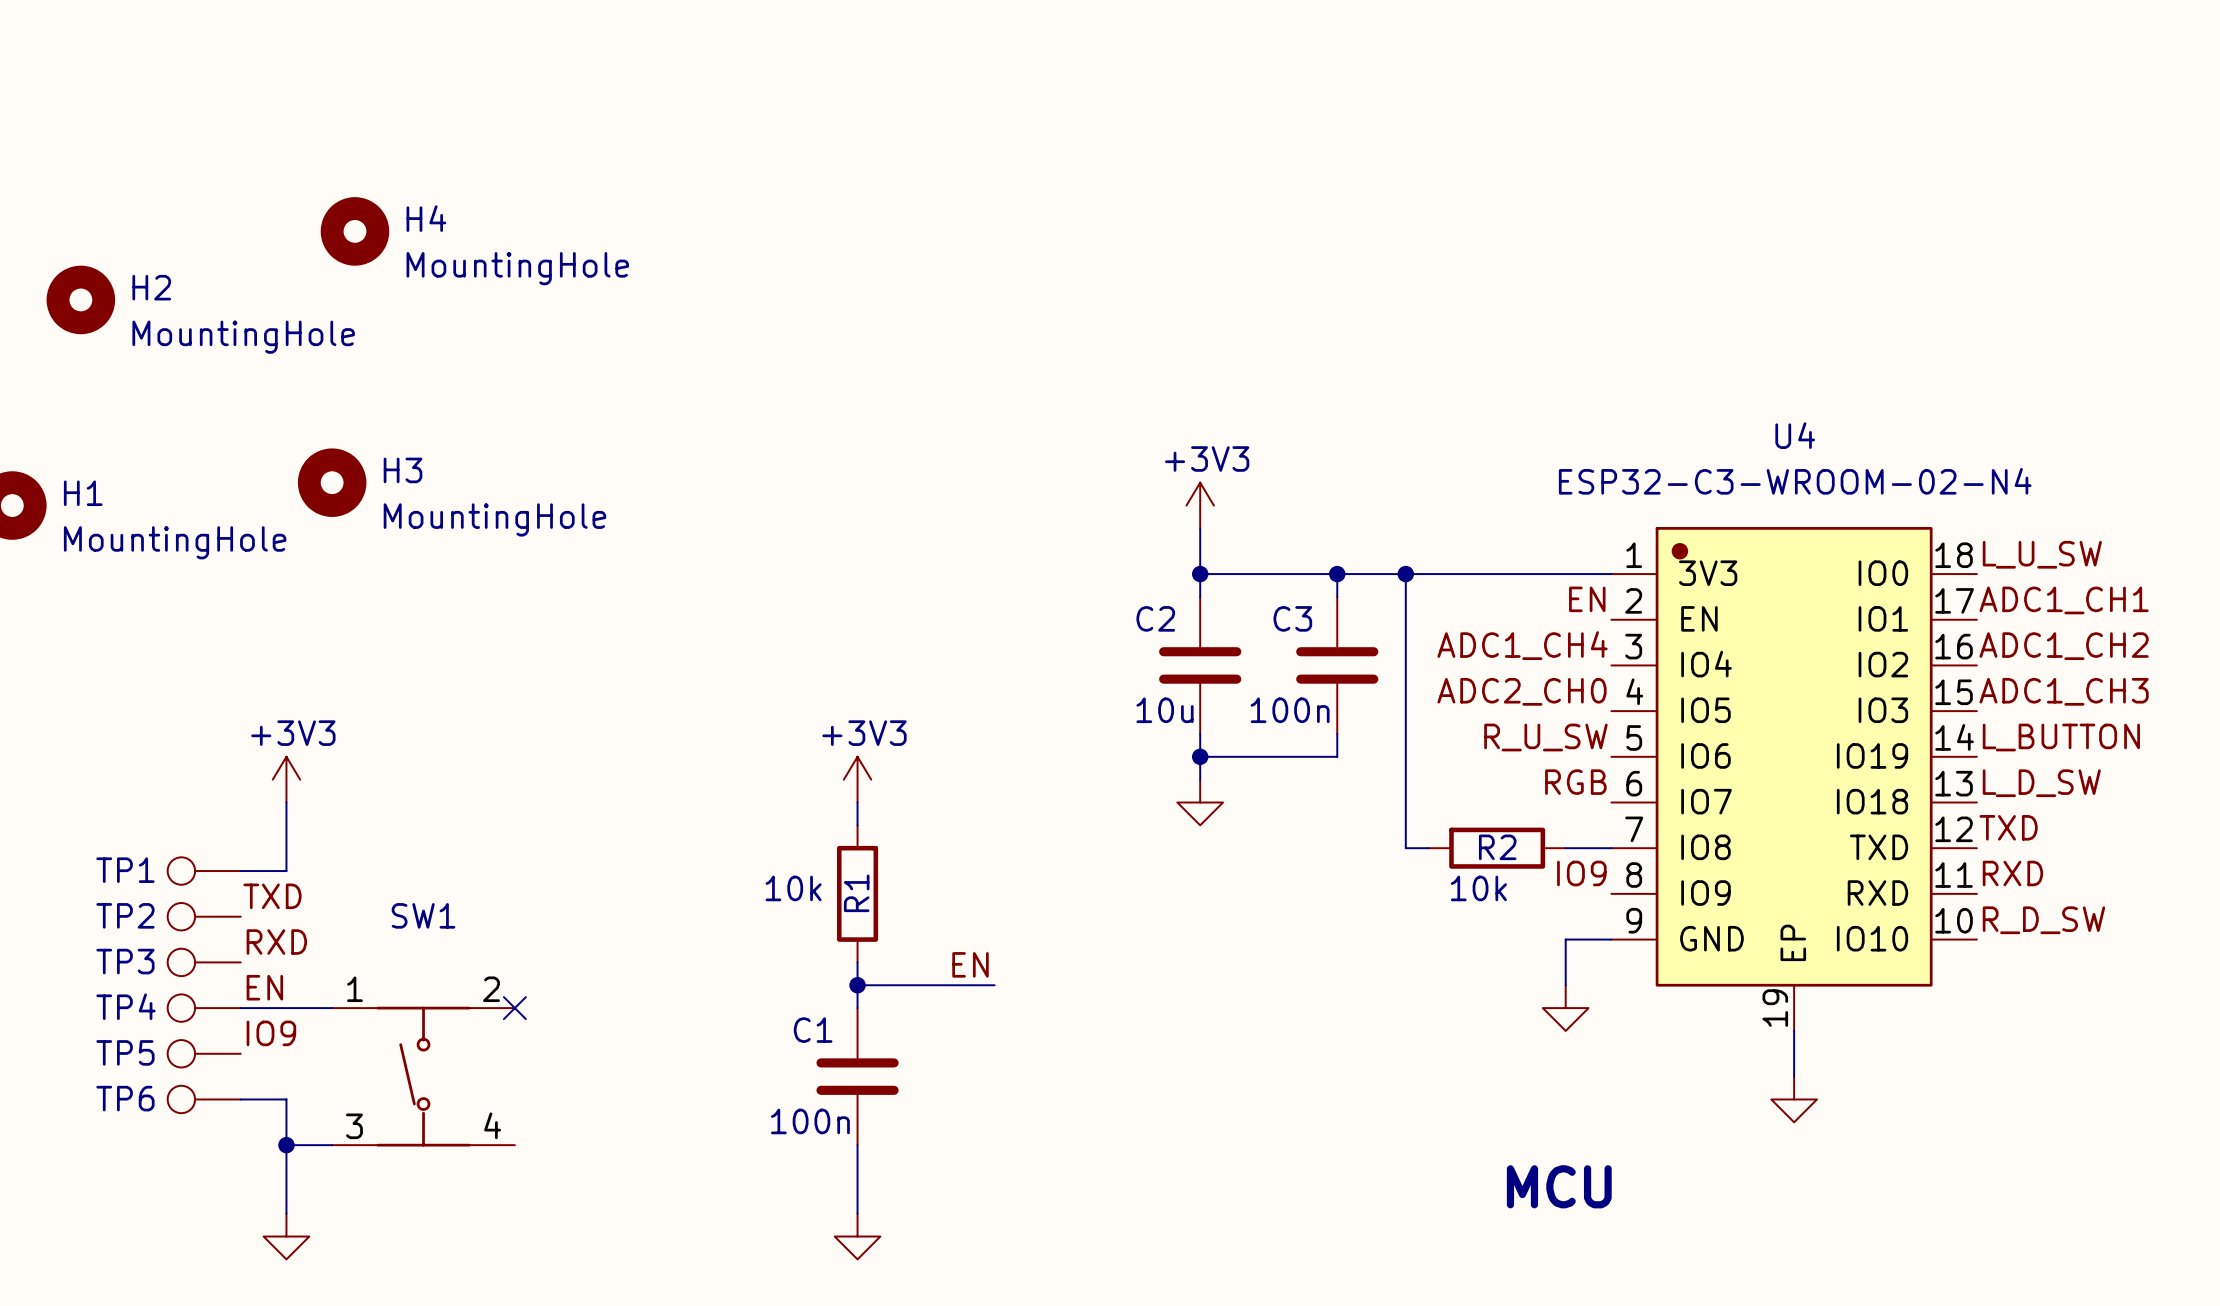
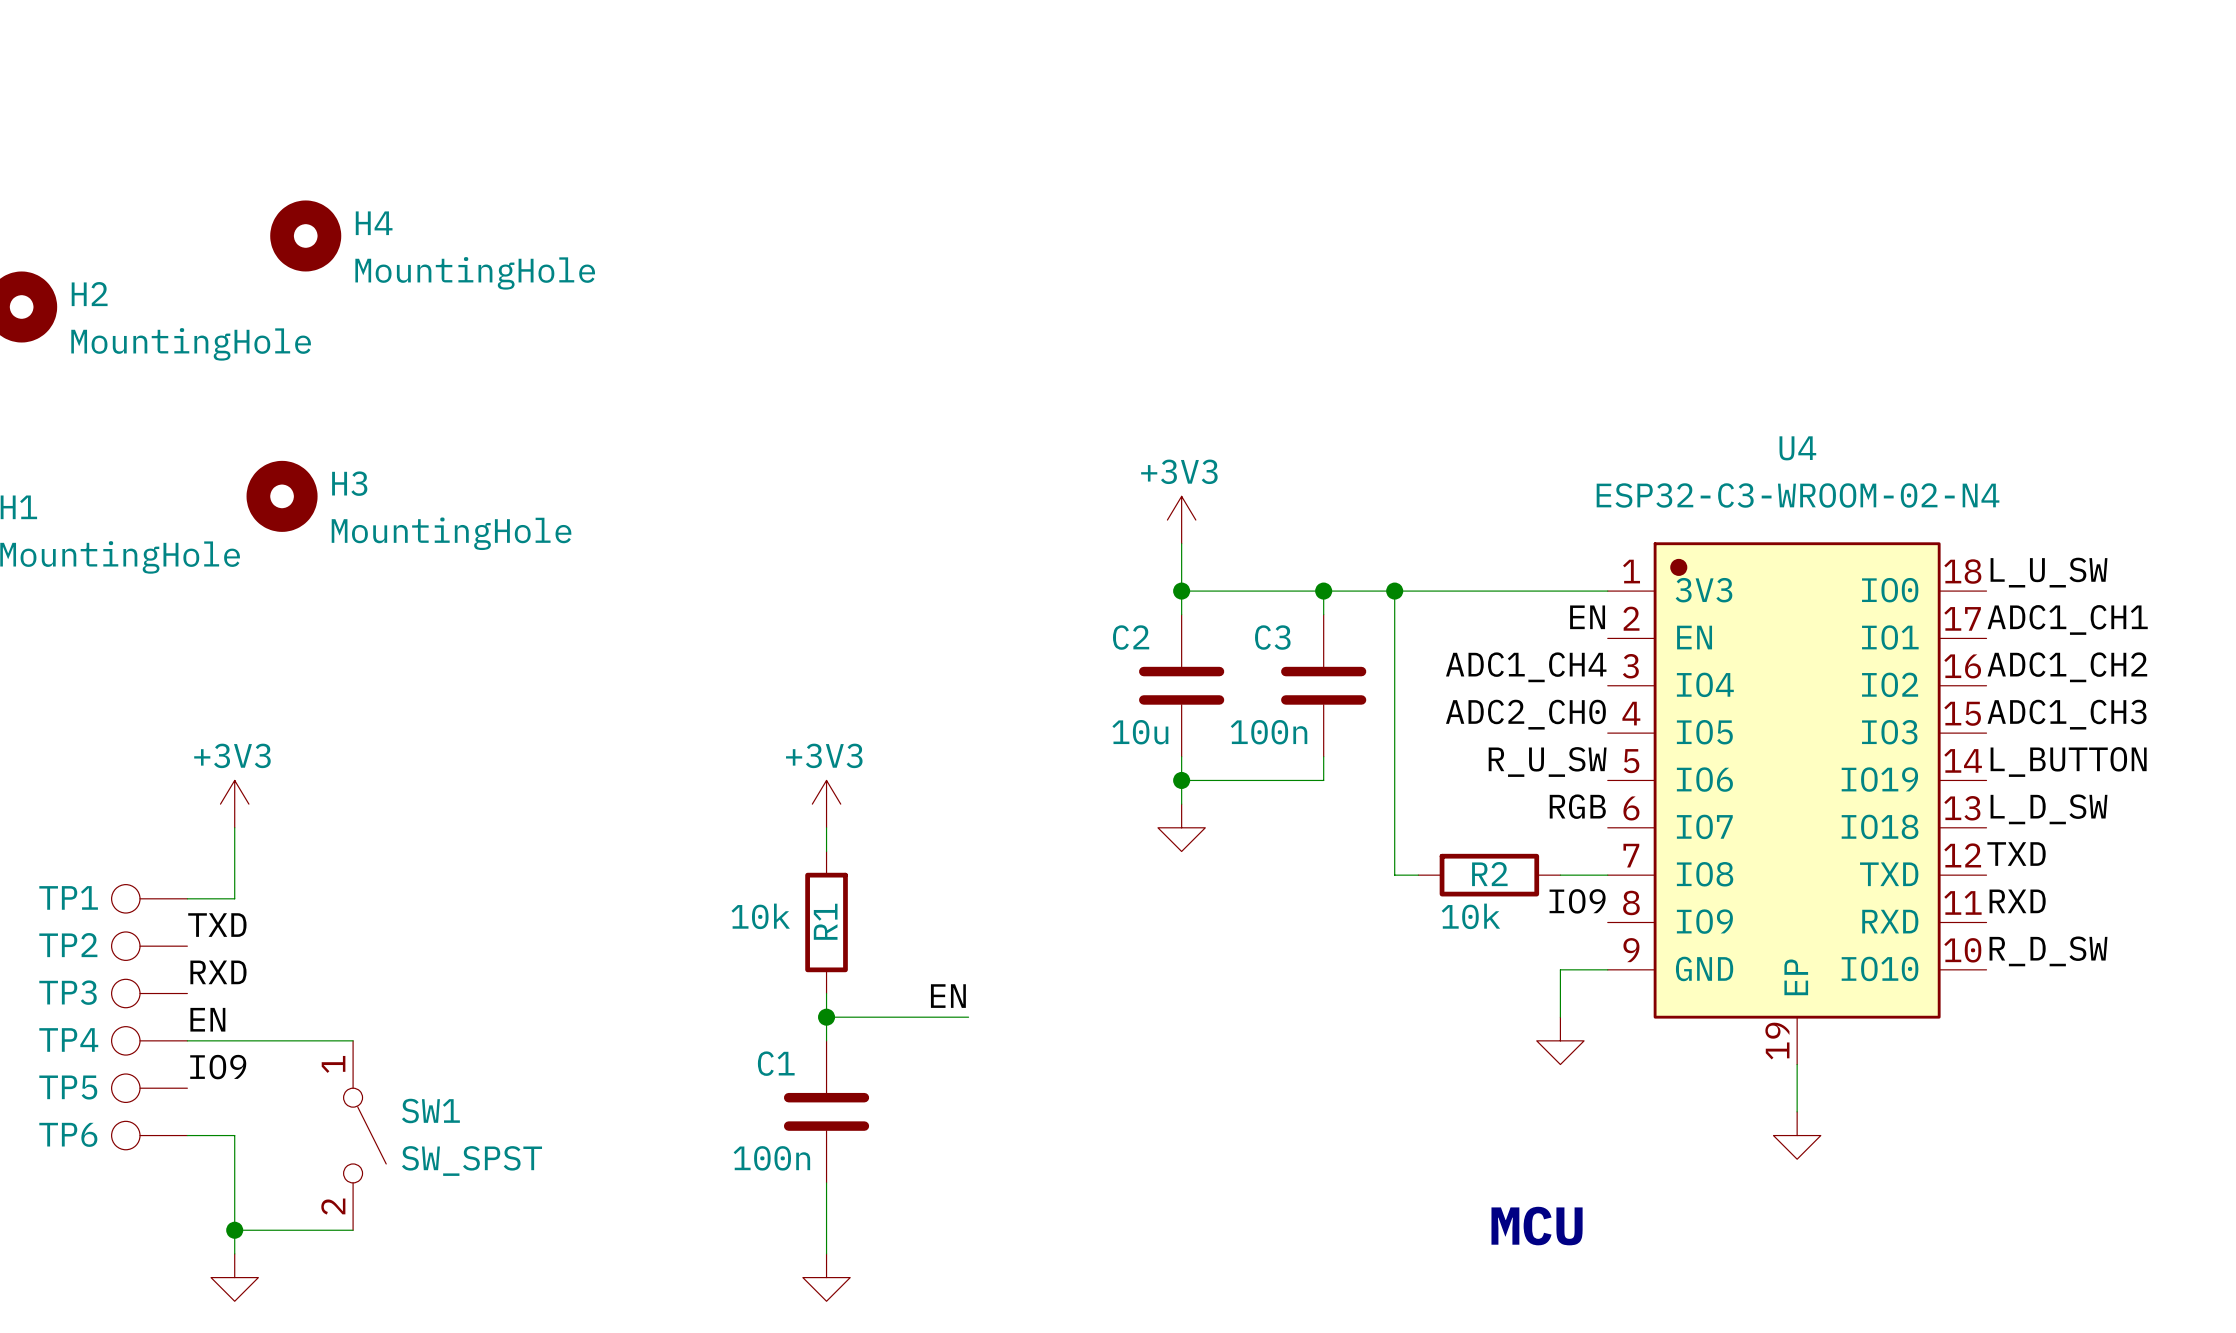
SW1 name position: SW1 (423, 915) -> SW1 (430, 1110)
SW1 symbol: [332, 1006, 515, 1147] -> [343, 1040, 387, 1231]
no-connect mark: (514, 1008) -> none
SW1 value: none -> SW_SPST (471, 1161)
wire: (286, 1145) (332, 1145) -> none
junction position: (286, 1145) -> (234, 1230)
wire: none -> (234, 1230) (353, 1230)

